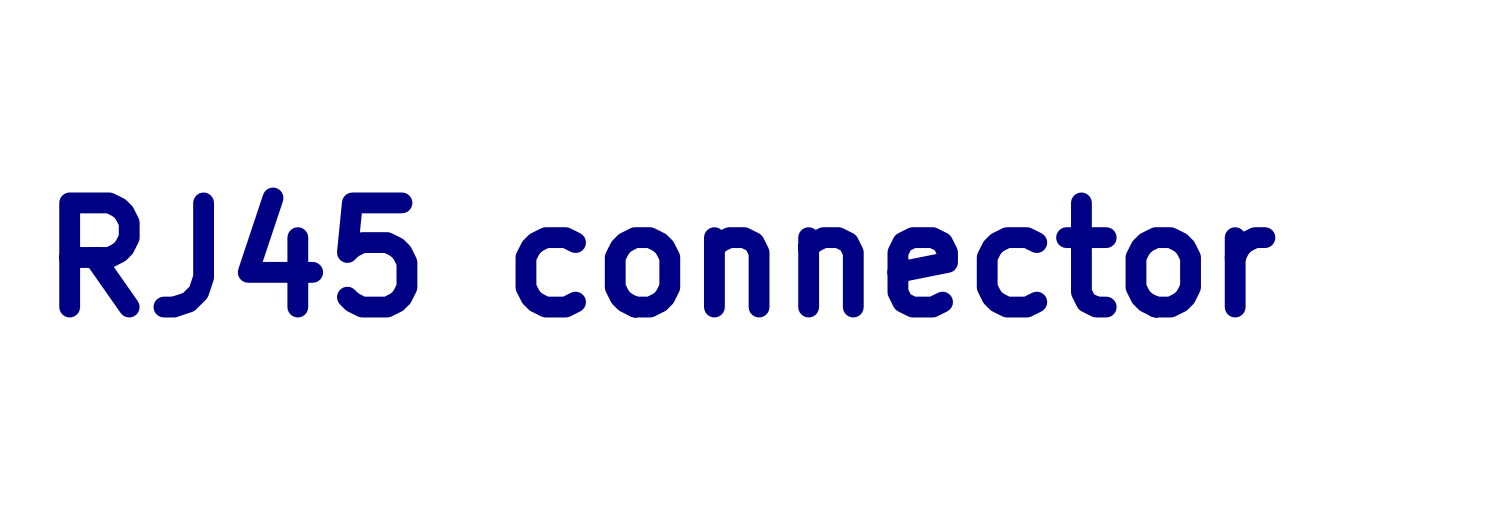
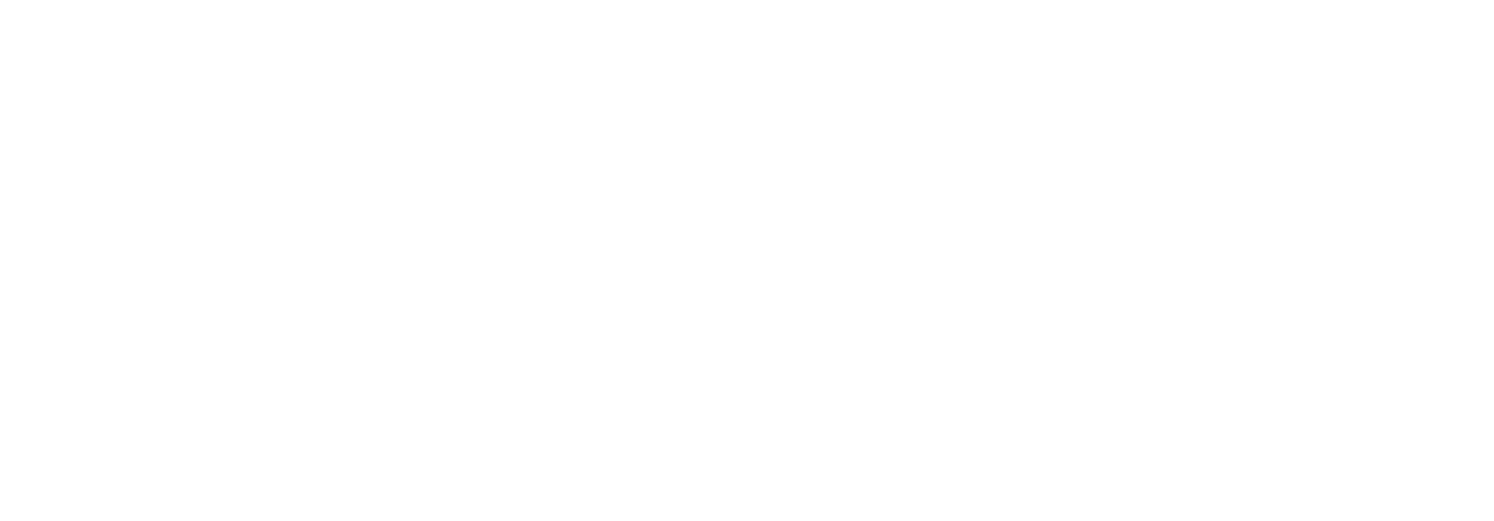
text: RJ45 connector (667, 252) -> none

